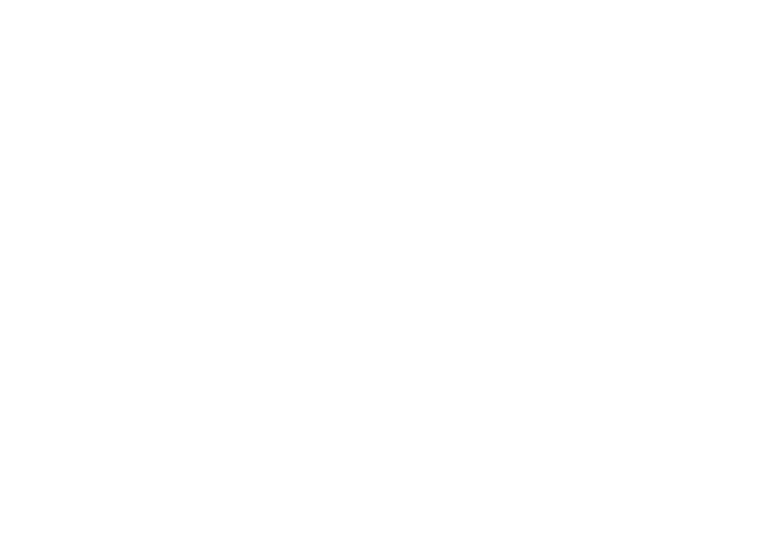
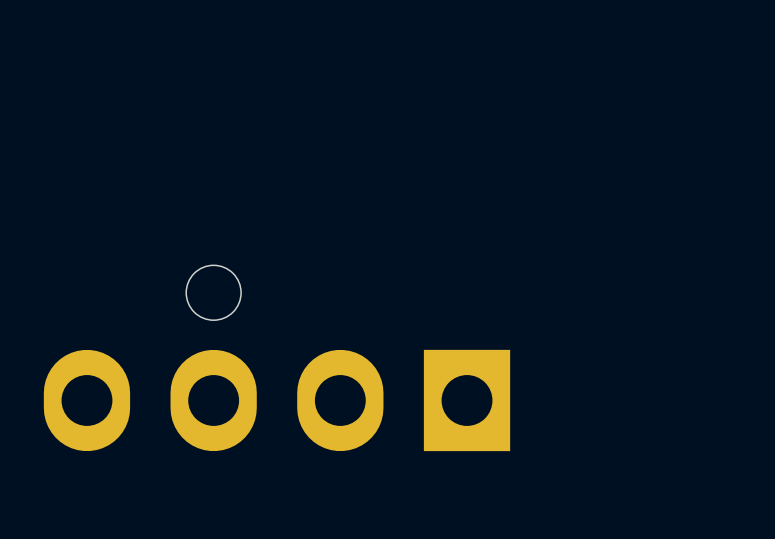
part: none -> (276, 358)

